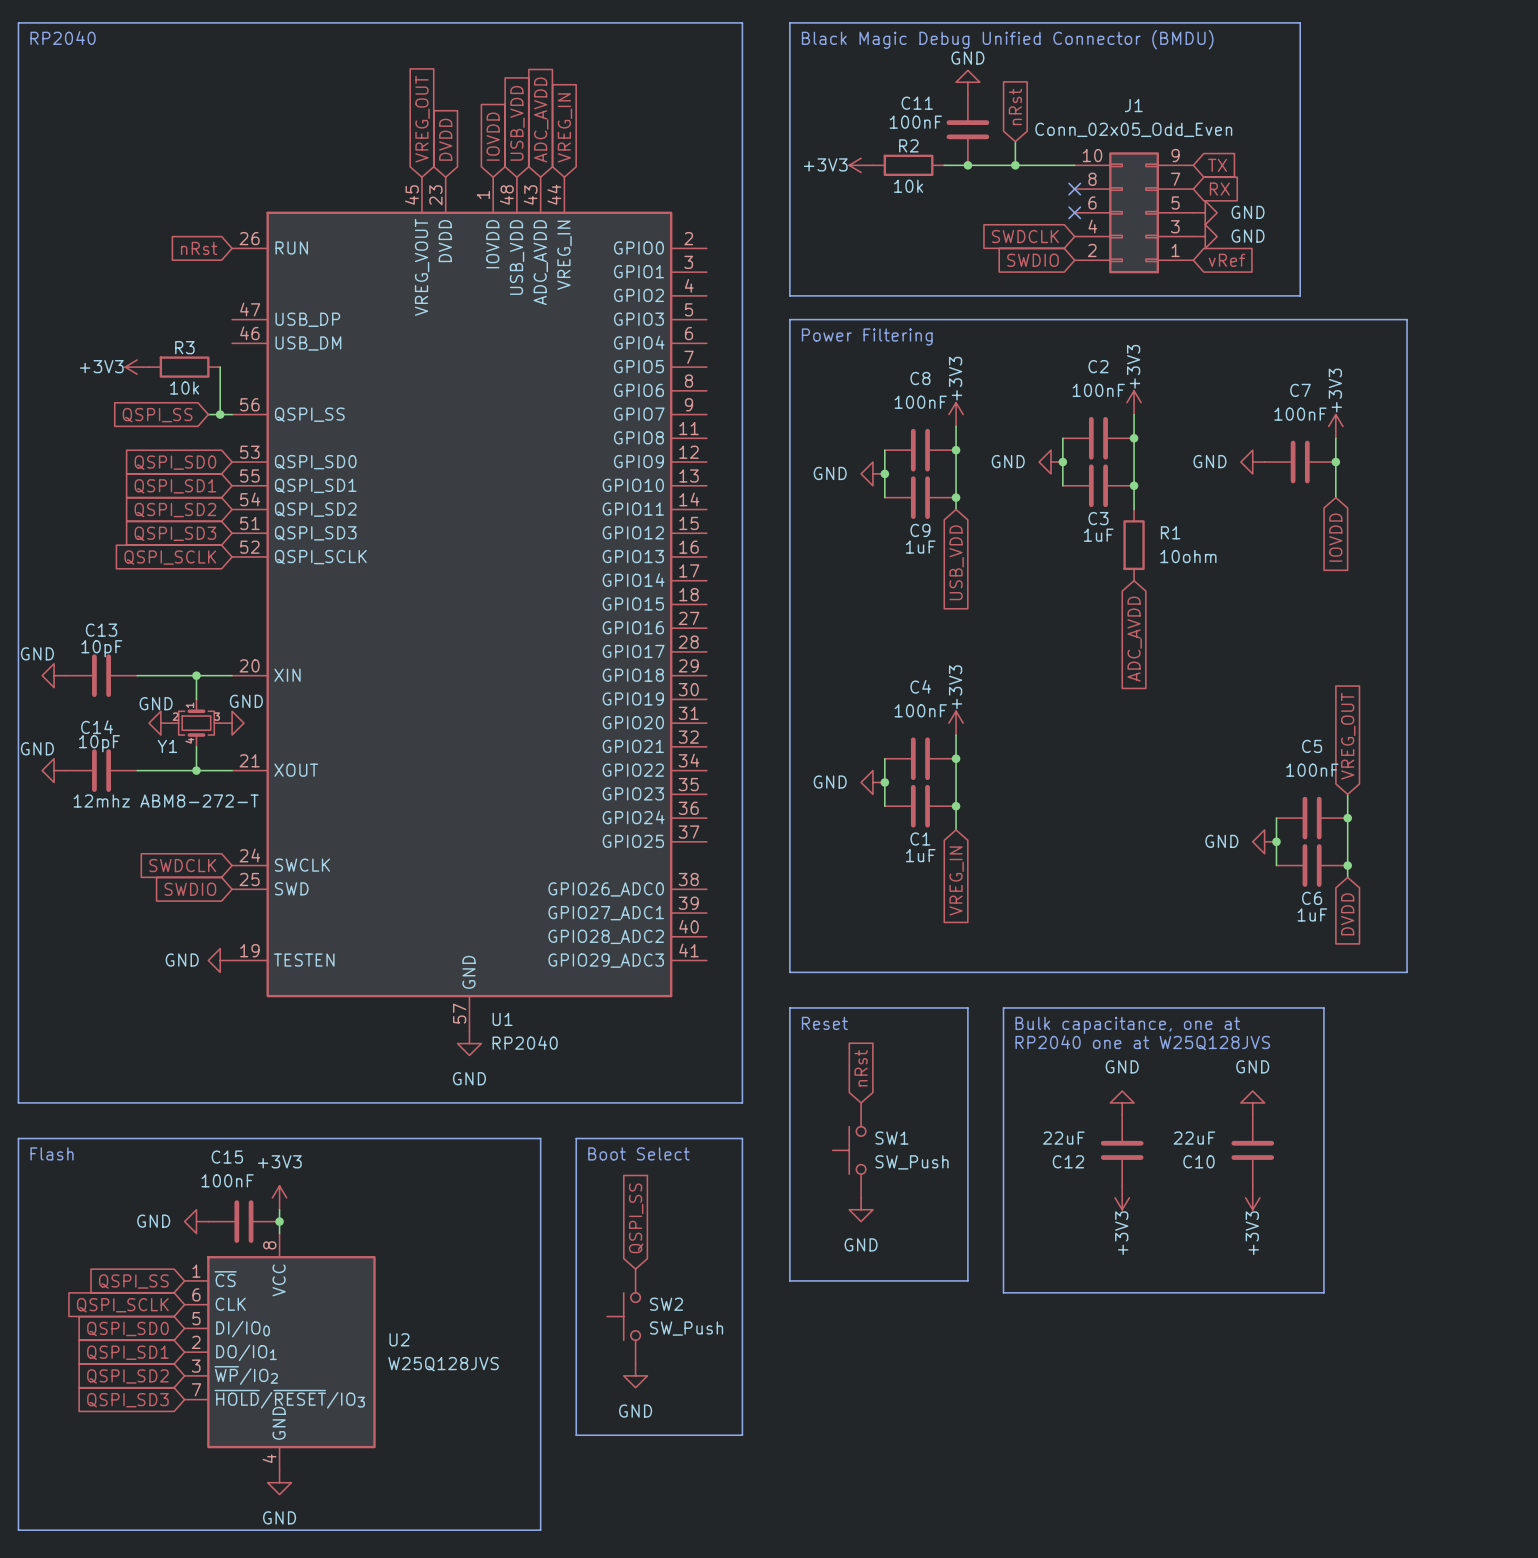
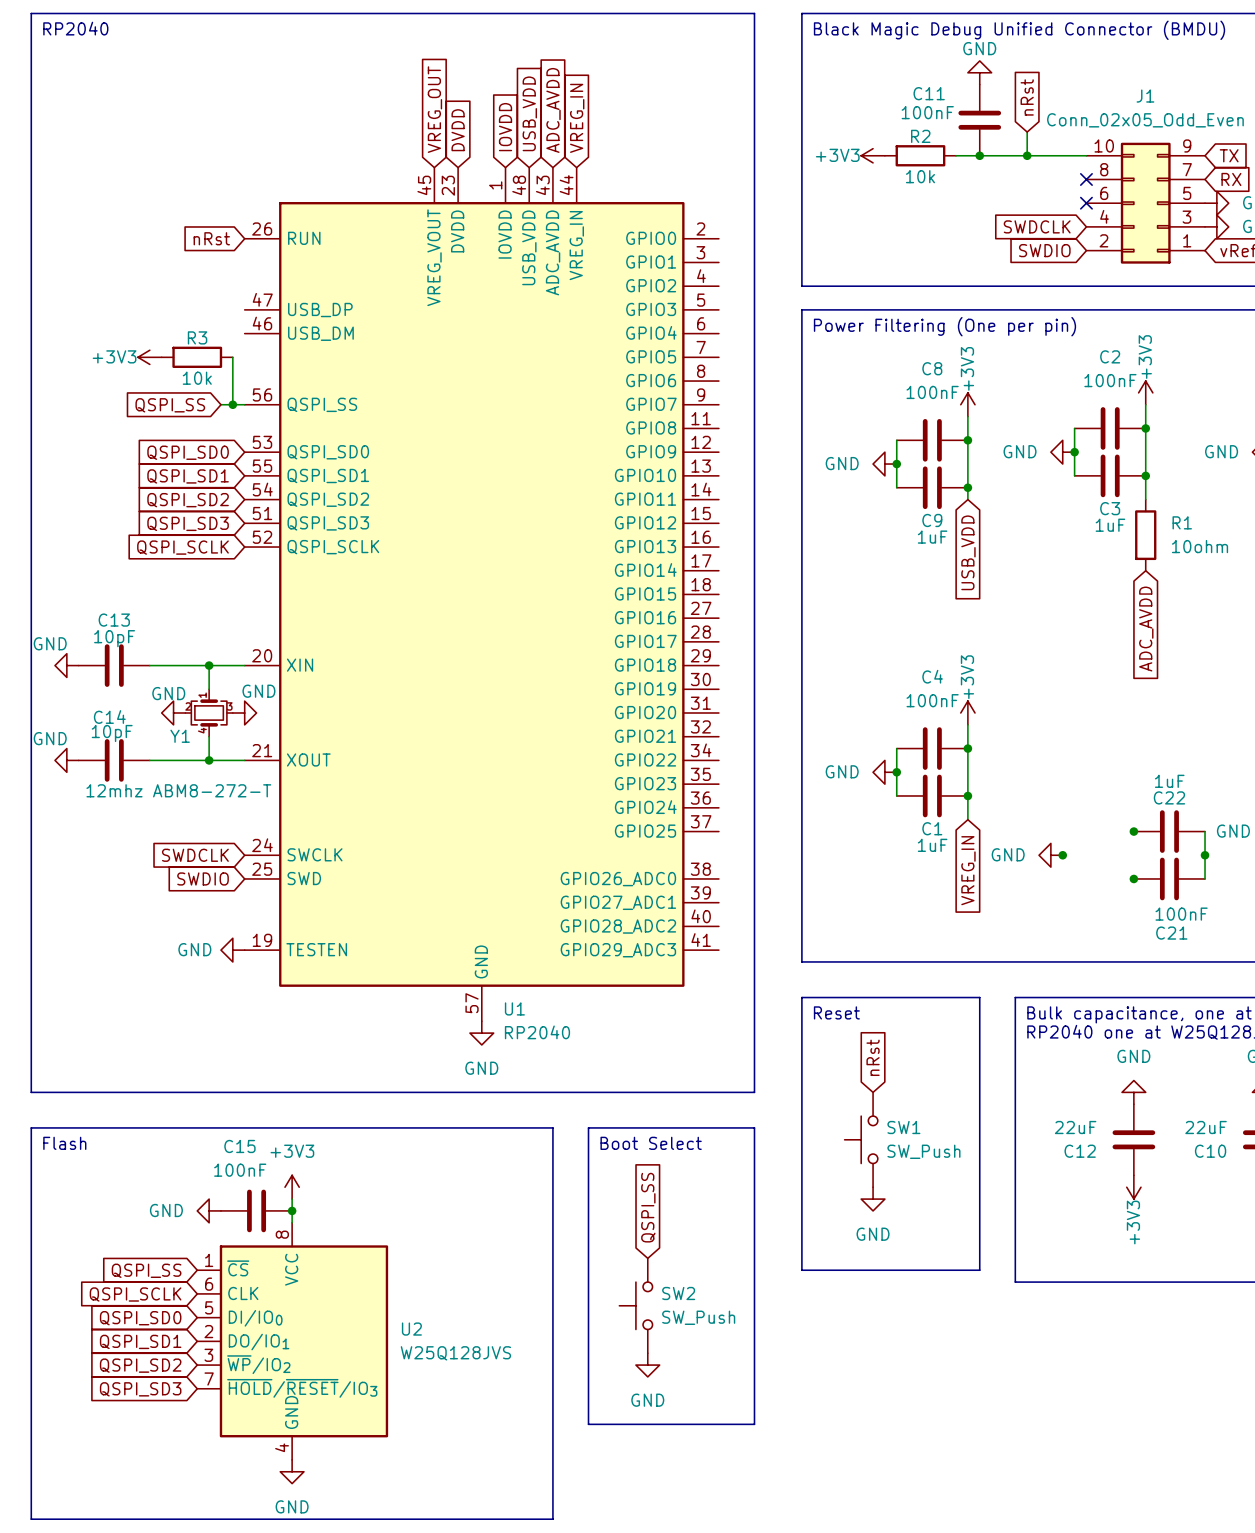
text: Power Filtering (867, 337) -> Power Filtering (One per pin) (944, 326)
junction: none -> (1133, 831)
C22: none -> 1uF (1169, 831)
wire: none -> (1205, 831) (1205, 878)
power symbol: none -> GND (1050, 855)
junction: none -> (1062, 855)
junction: none -> (1205, 855)
junction: none -> (1133, 878)
C21: none -> 100nF (1169, 878)

